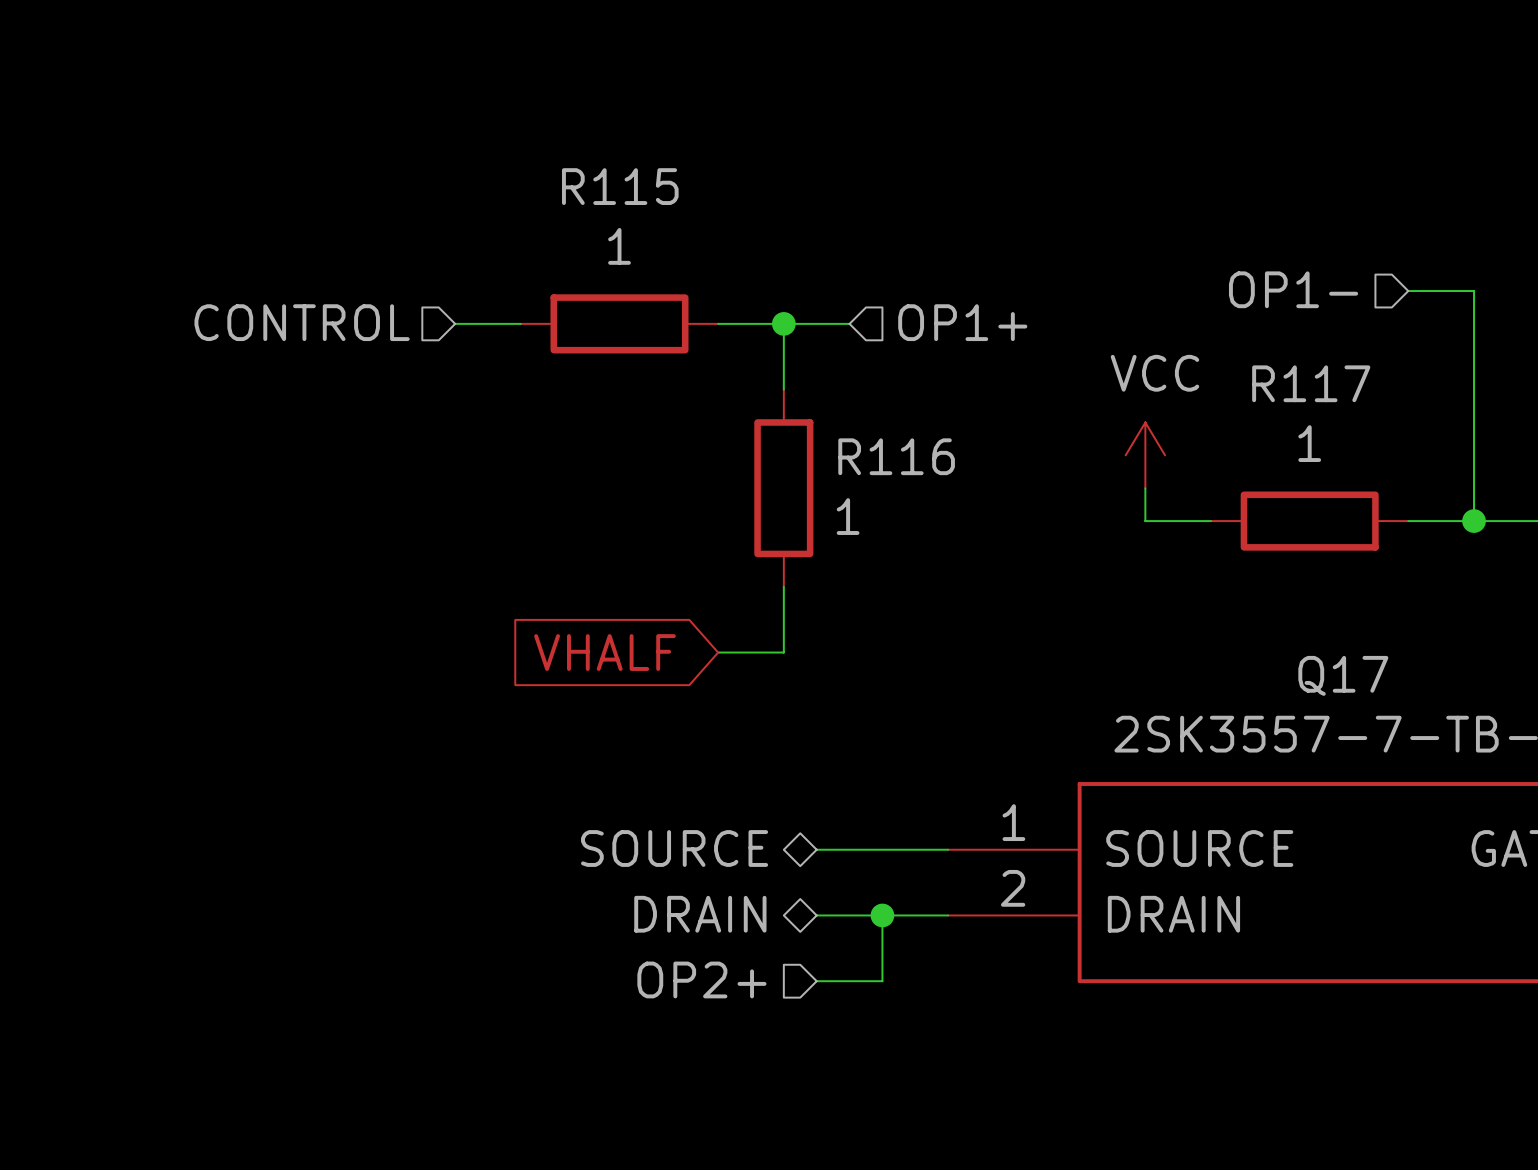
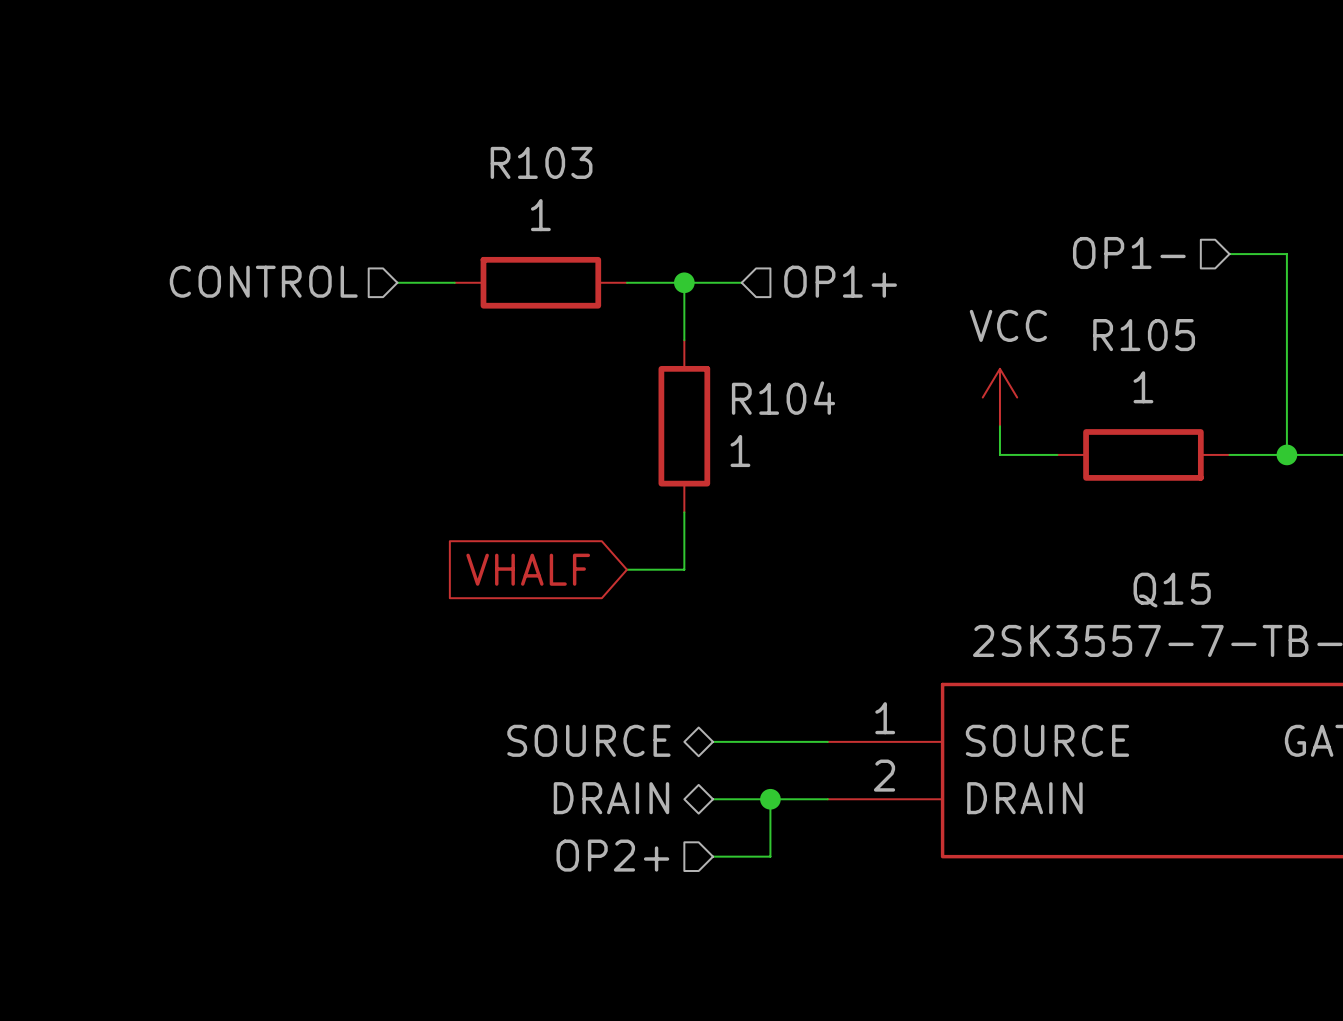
R115 name: R115 (620, 186) -> R103 (541, 162)
R117 name: R117 (1311, 383) -> R105 (1144, 335)
R116 name: R116 (896, 456) -> R104 (783, 398)
Q17 name: Q17 (1343, 675) -> Q15 (1172, 590)

